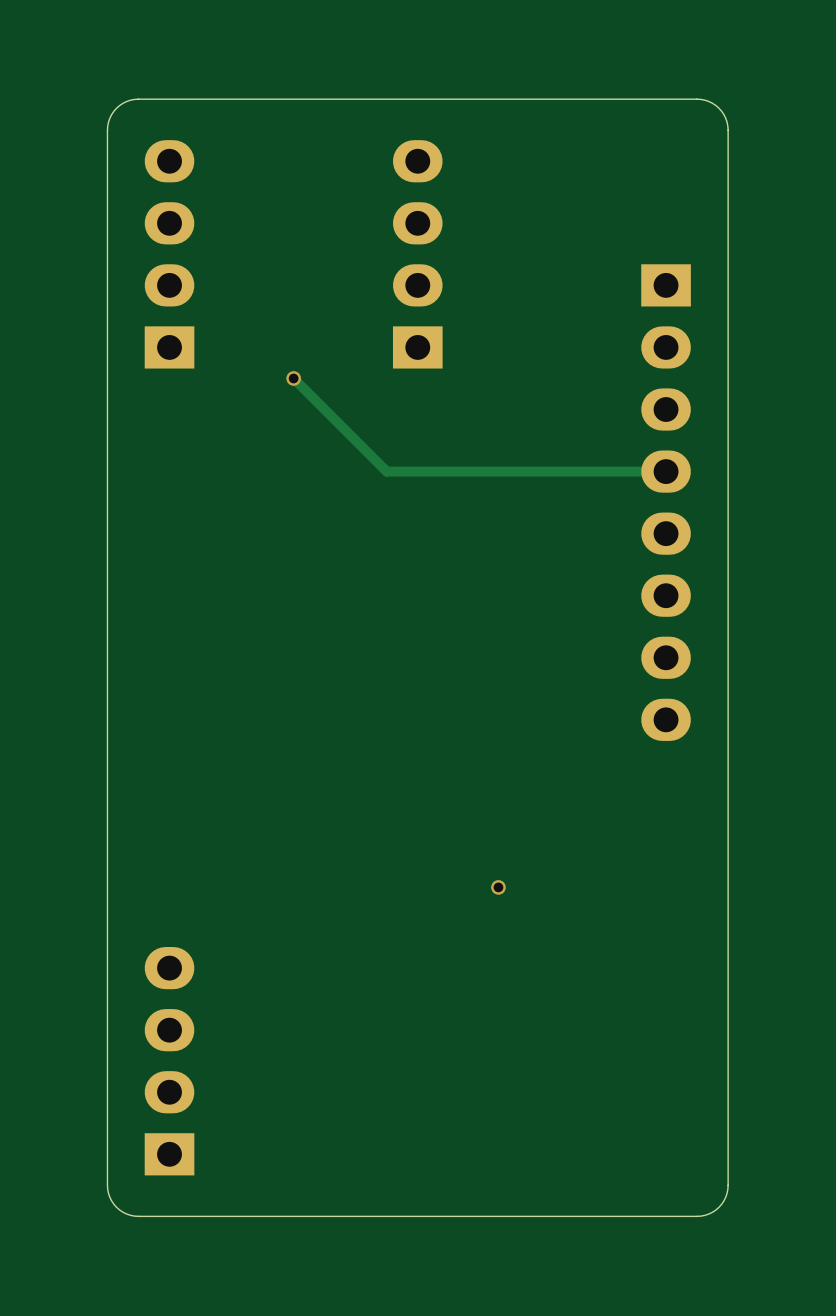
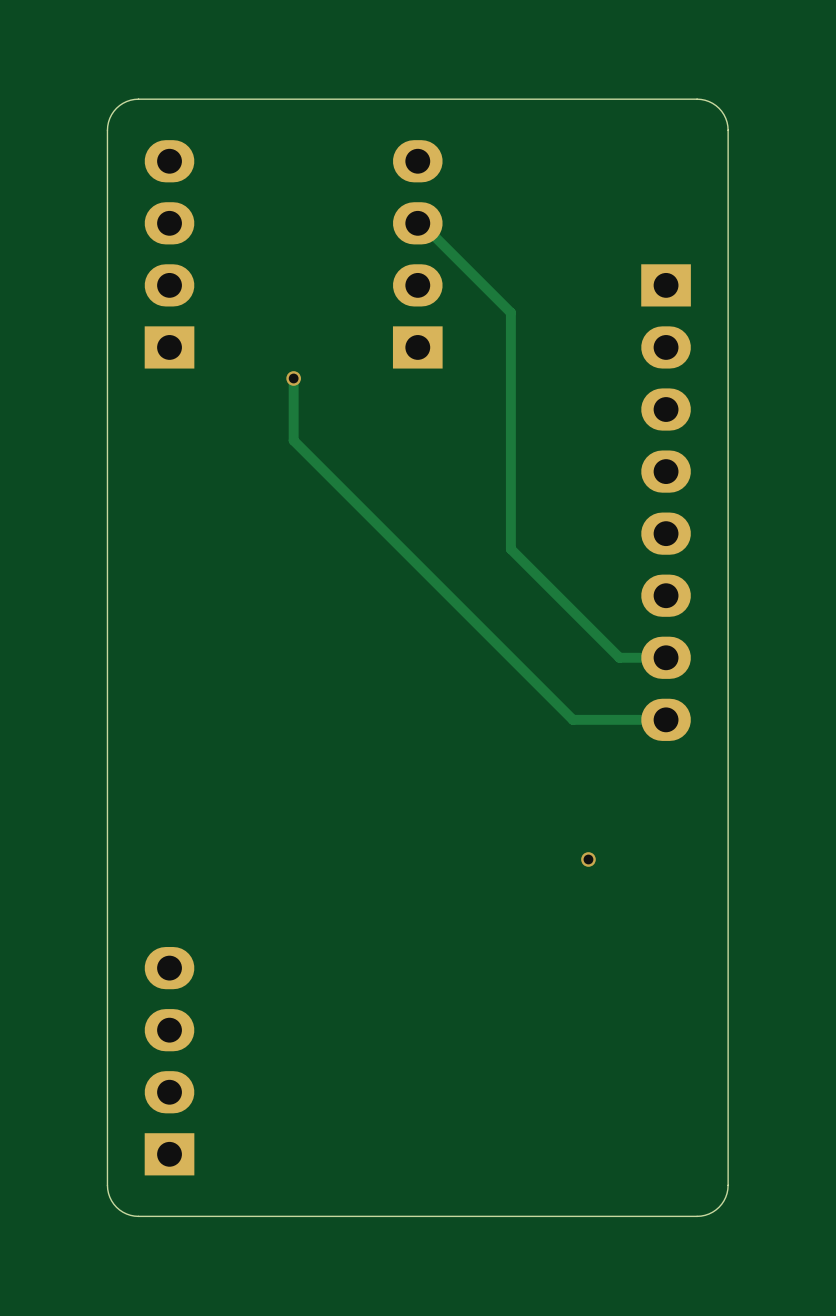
track: none -> (417, 223) (421, 223) (510, 312) (510, 549) (619, 657) (666, 657)
track: (293, 378) (386, 471) (666, 471) -> (293, 378) (293, 440) (572, 719) (666, 719)
via position: (498, 887) -> (588, 859)

